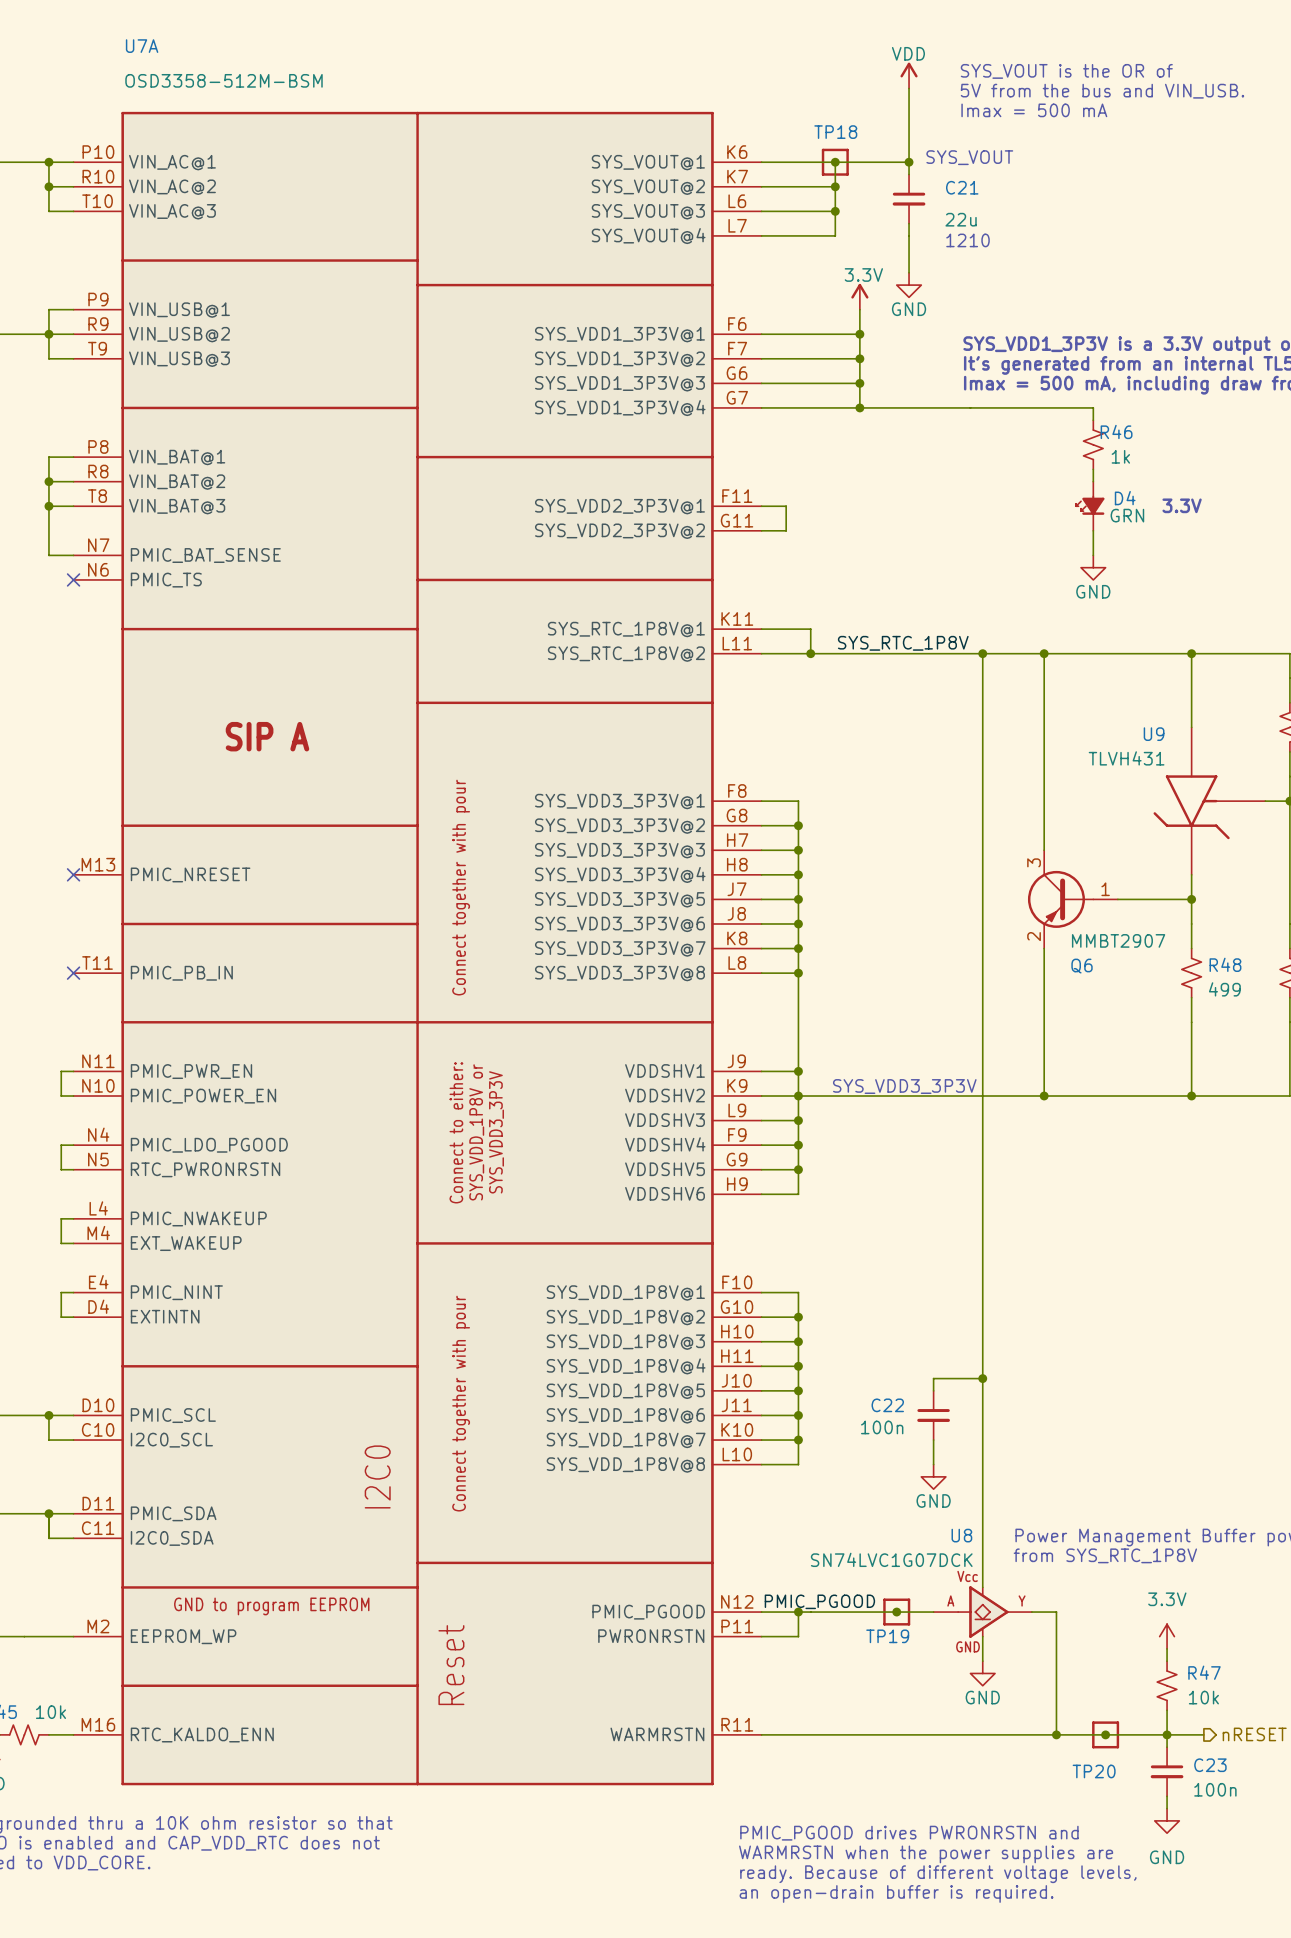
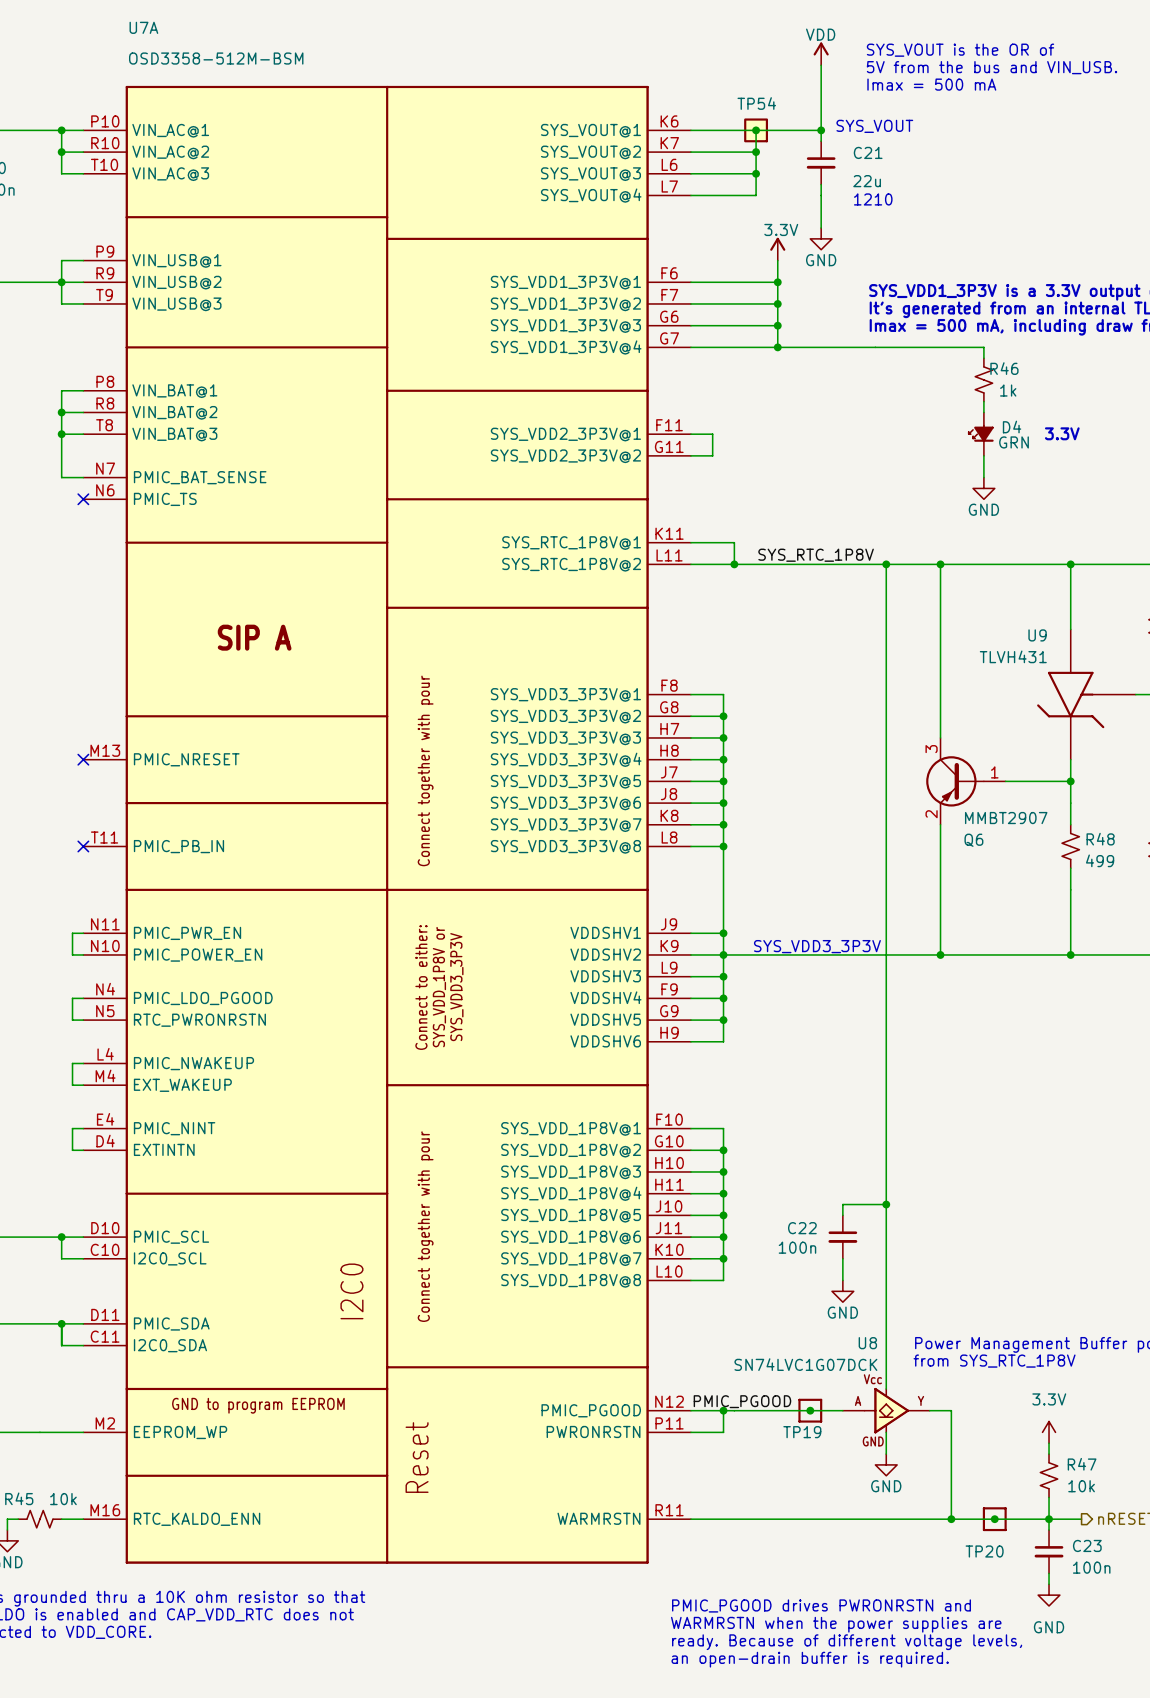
TP18: (835, 162) -> none
TP54: none -> (756, 130)

